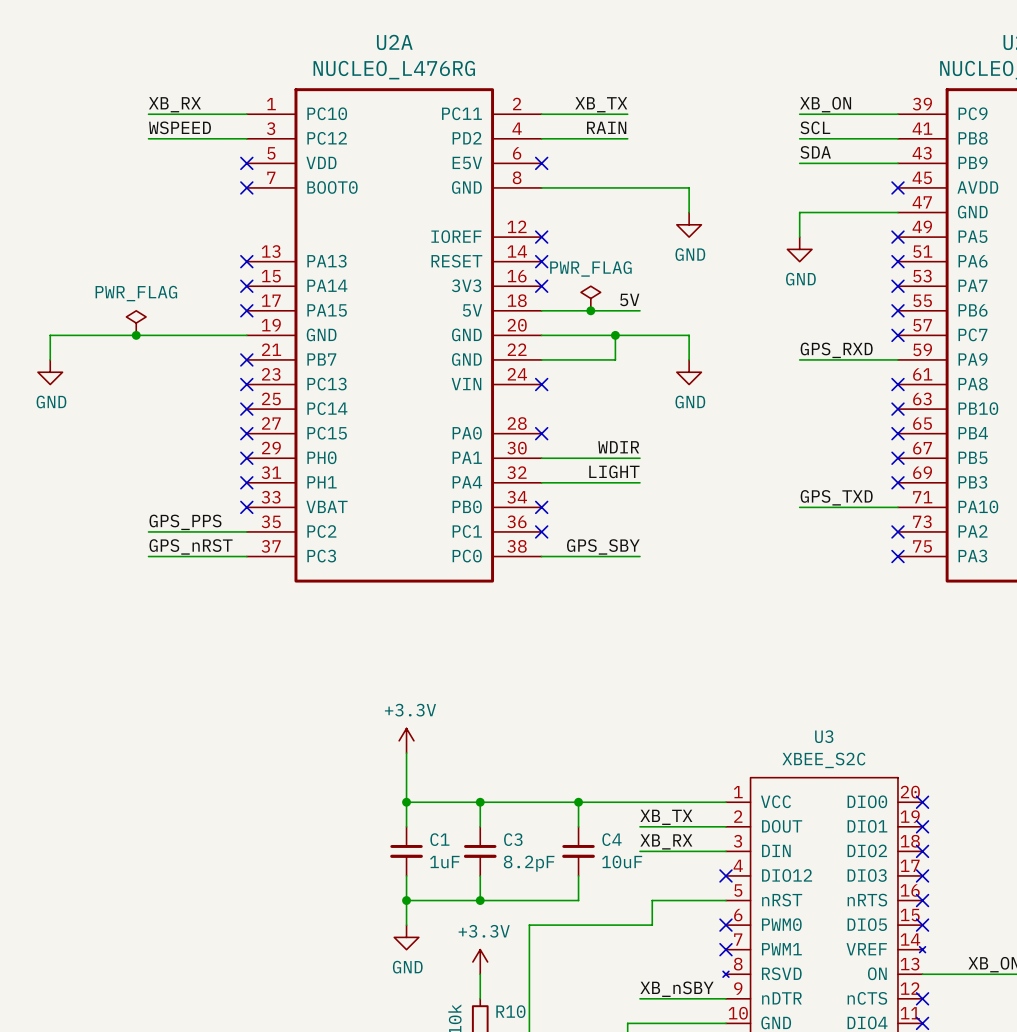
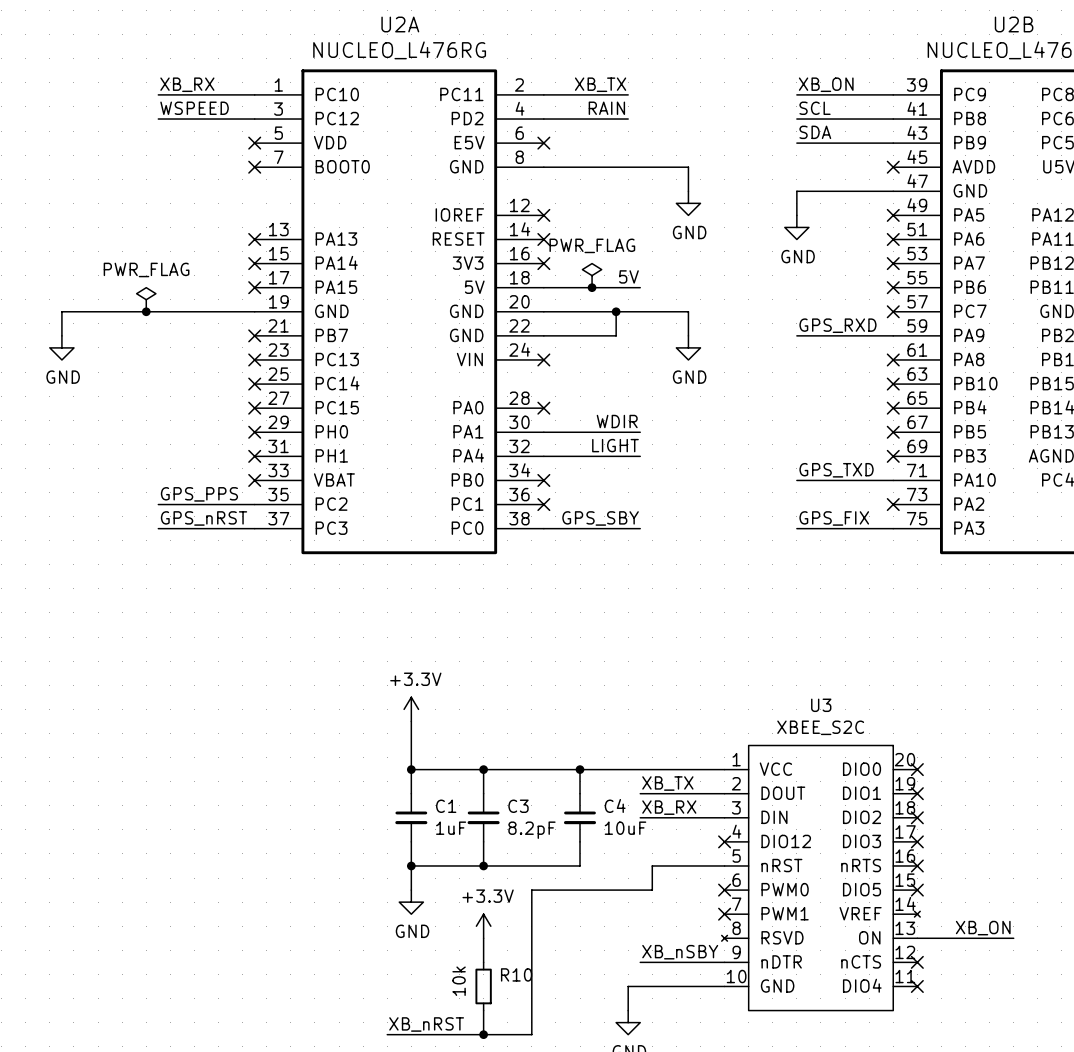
label: none -> GPS_FIX (834, 518)
wire: none -> (796, 528) (893, 528)
no-connect mark: (897, 556) -> none

